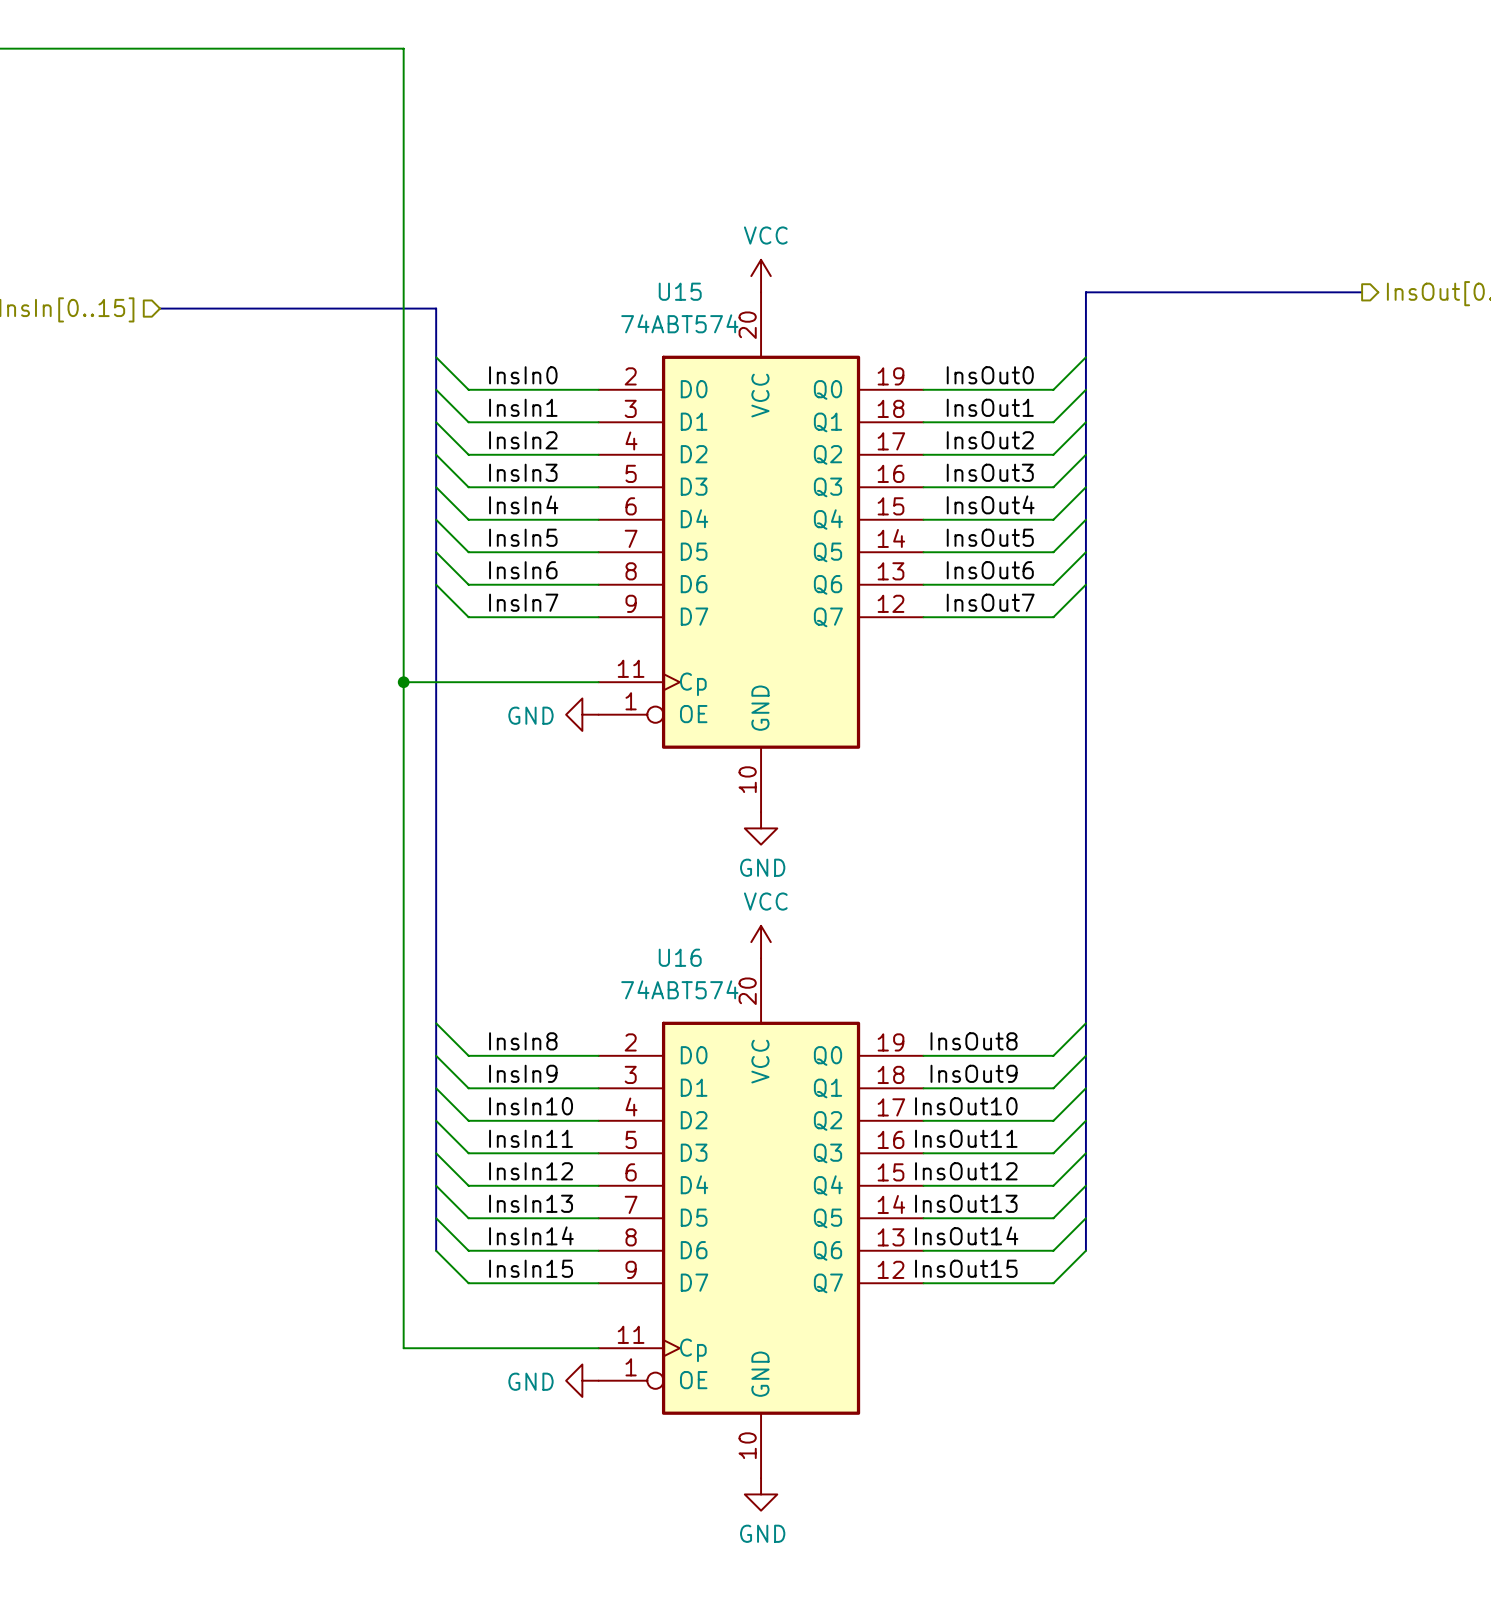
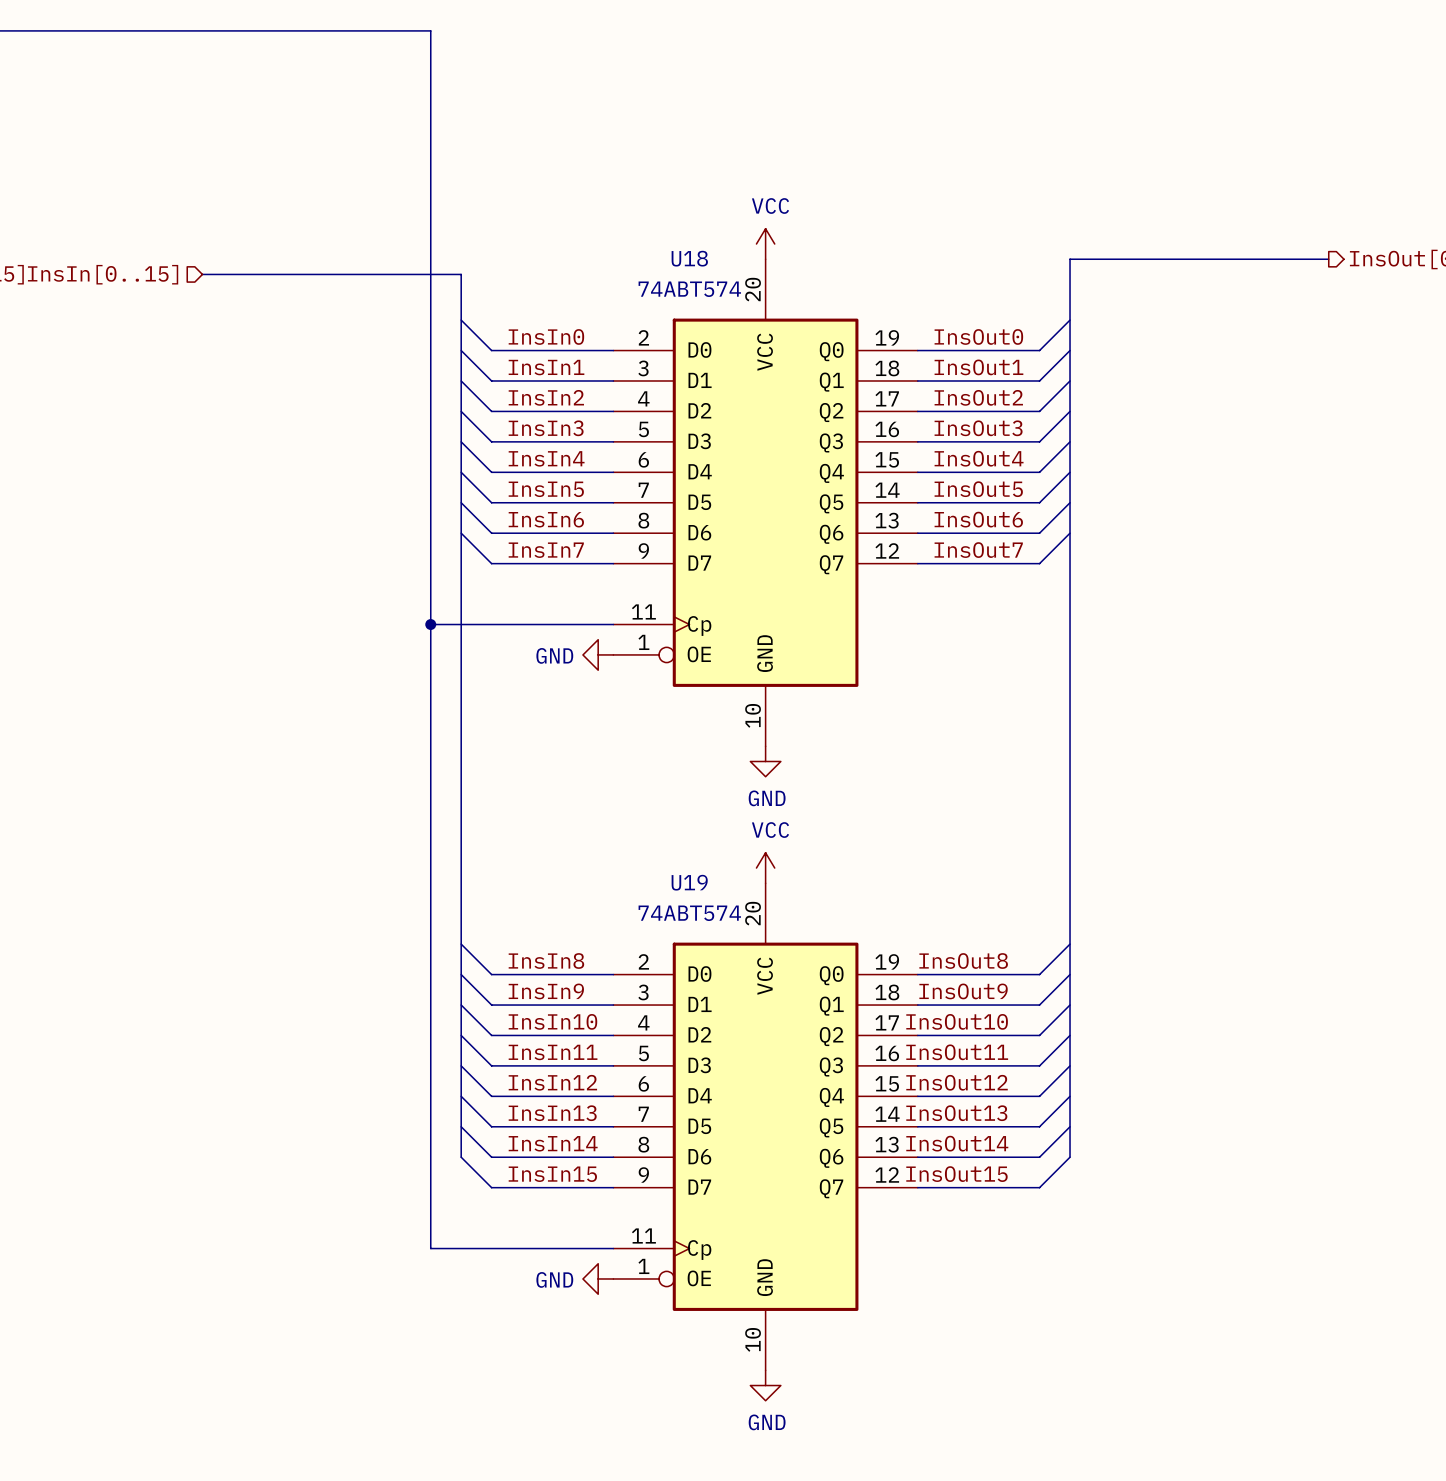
U15 name: U15 (680, 291) -> U18 (689, 258)
U16 name: U16 (680, 957) -> U19 (689, 882)

